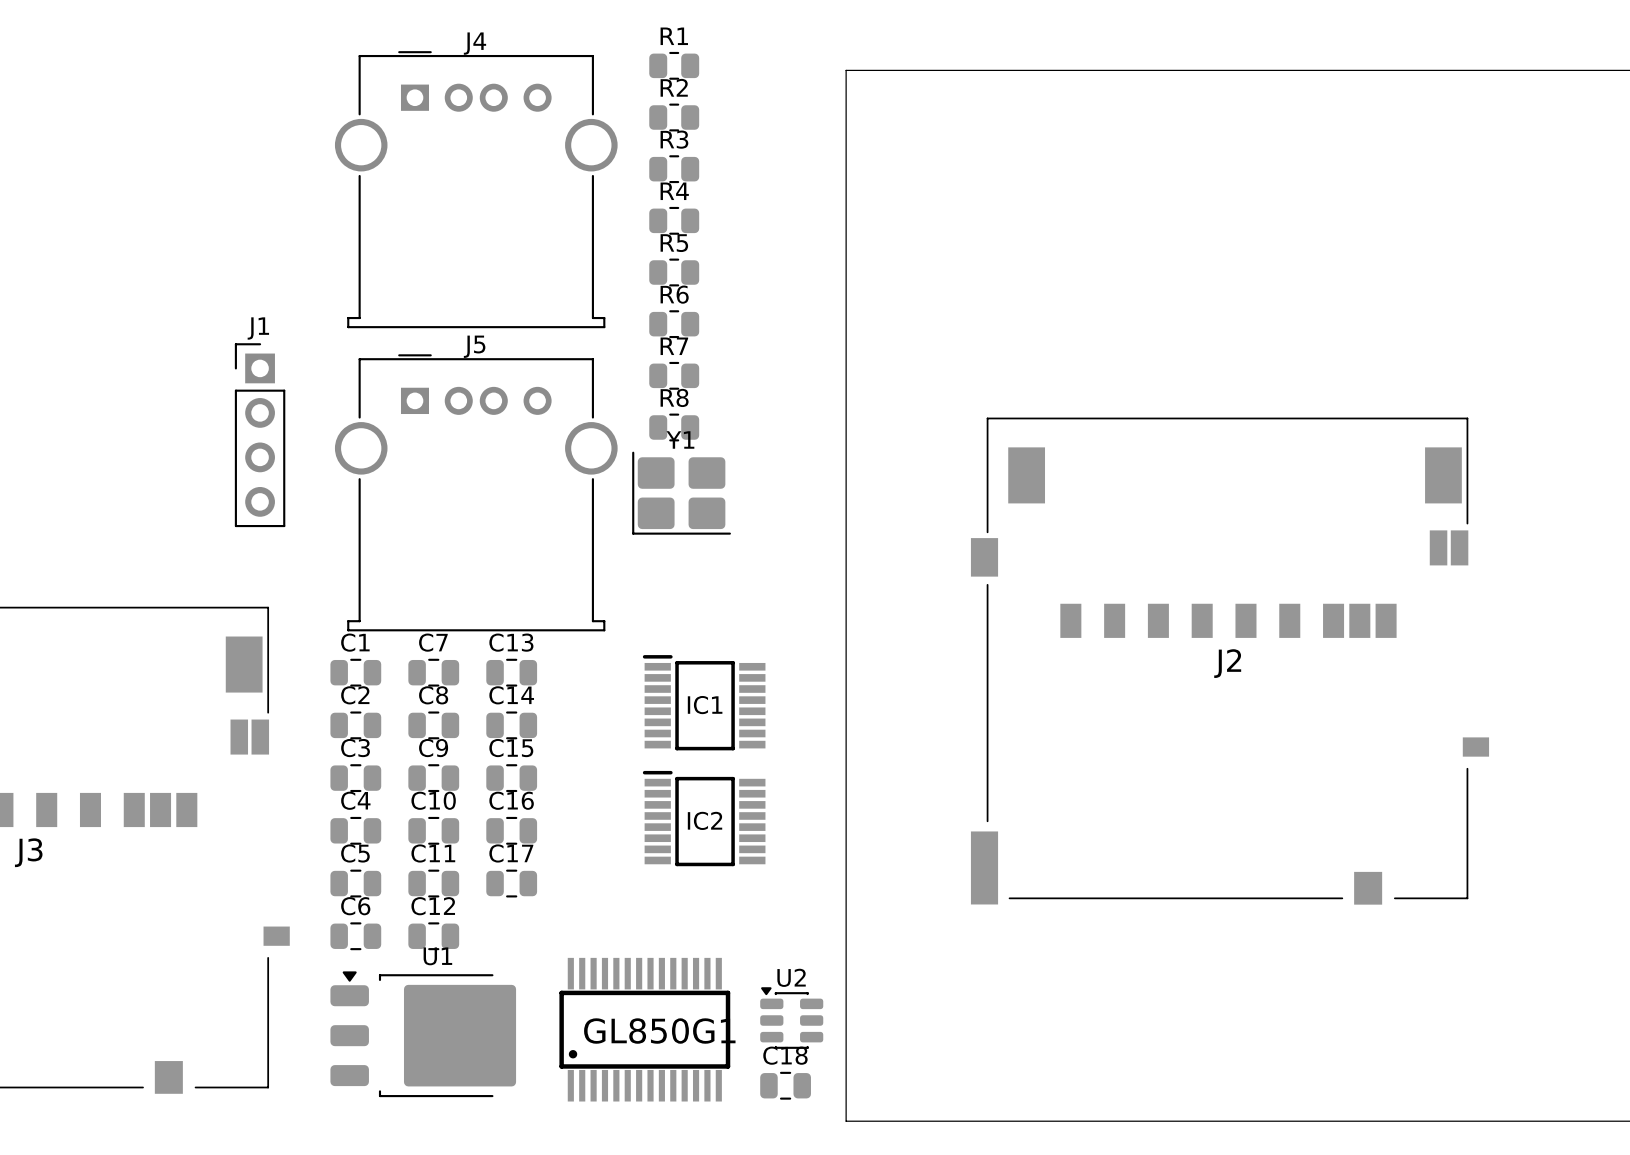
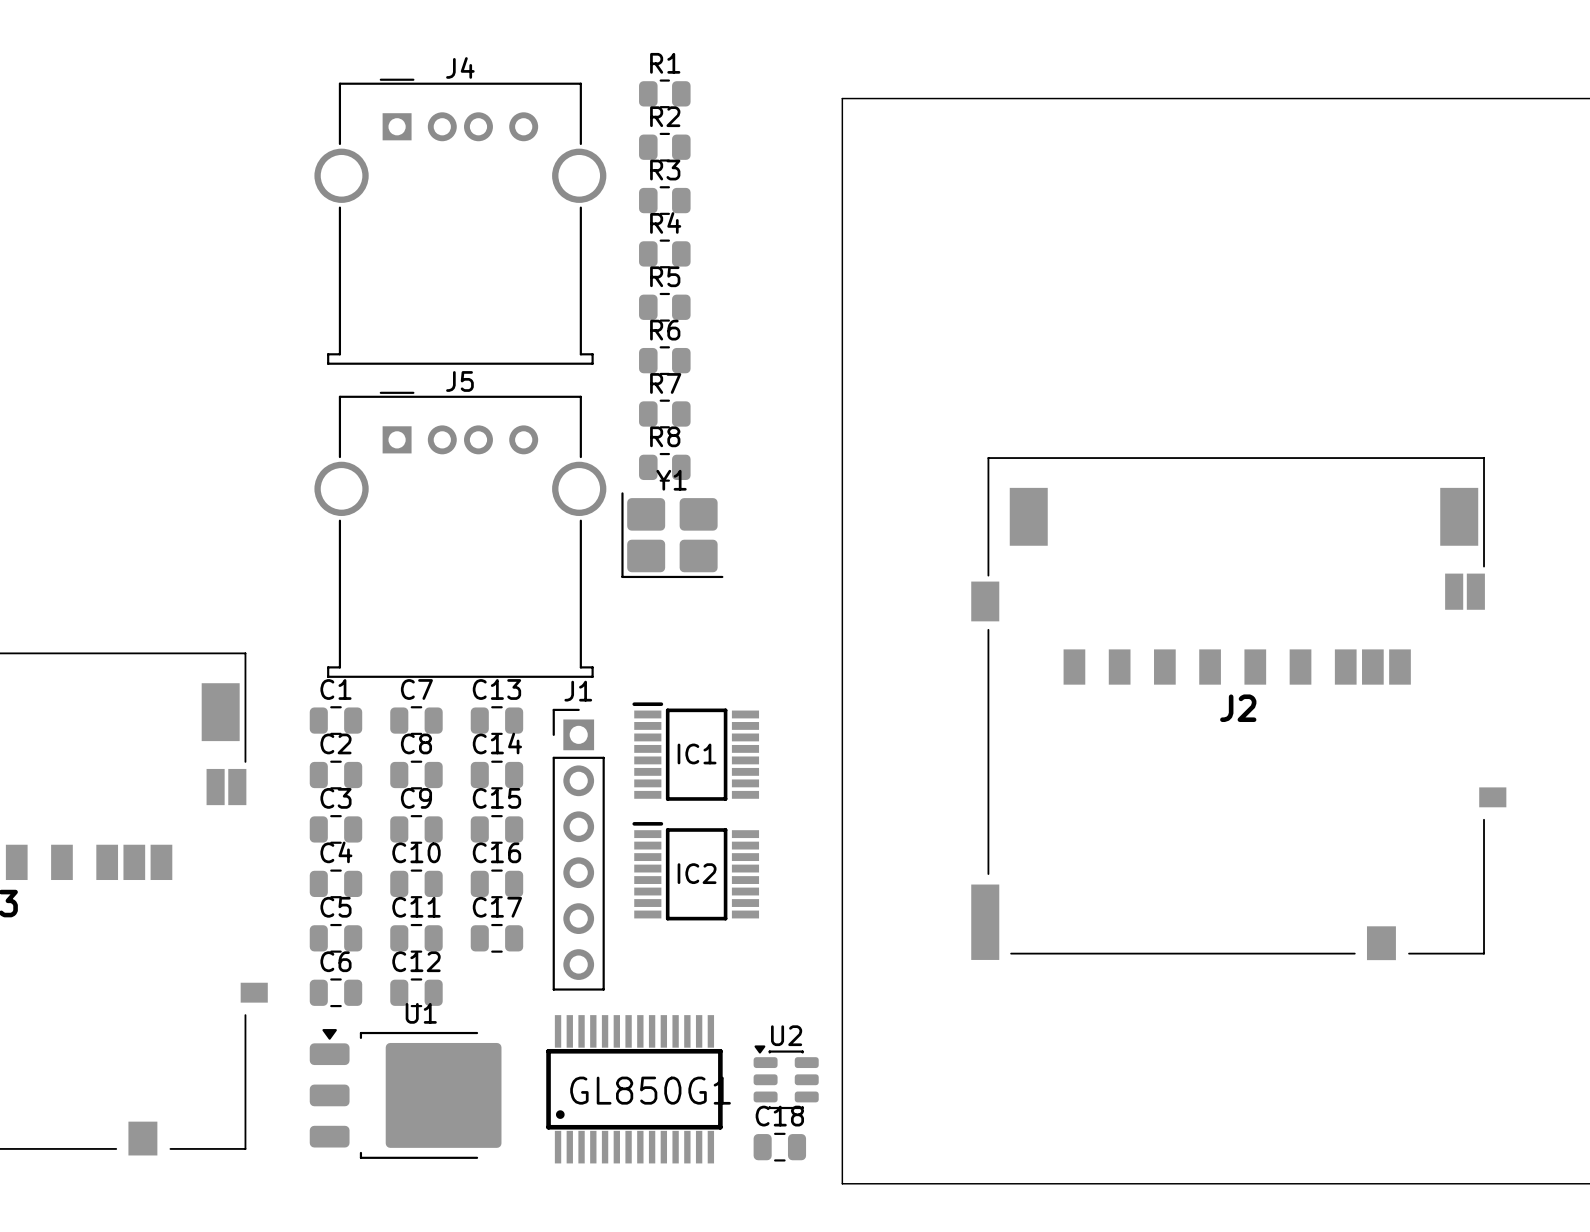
J1 name position: J1 (258, 328) -> J1 (578, 691)
J1 footprint: [234, 343, 286, 528] -> [552, 708, 605, 991]

